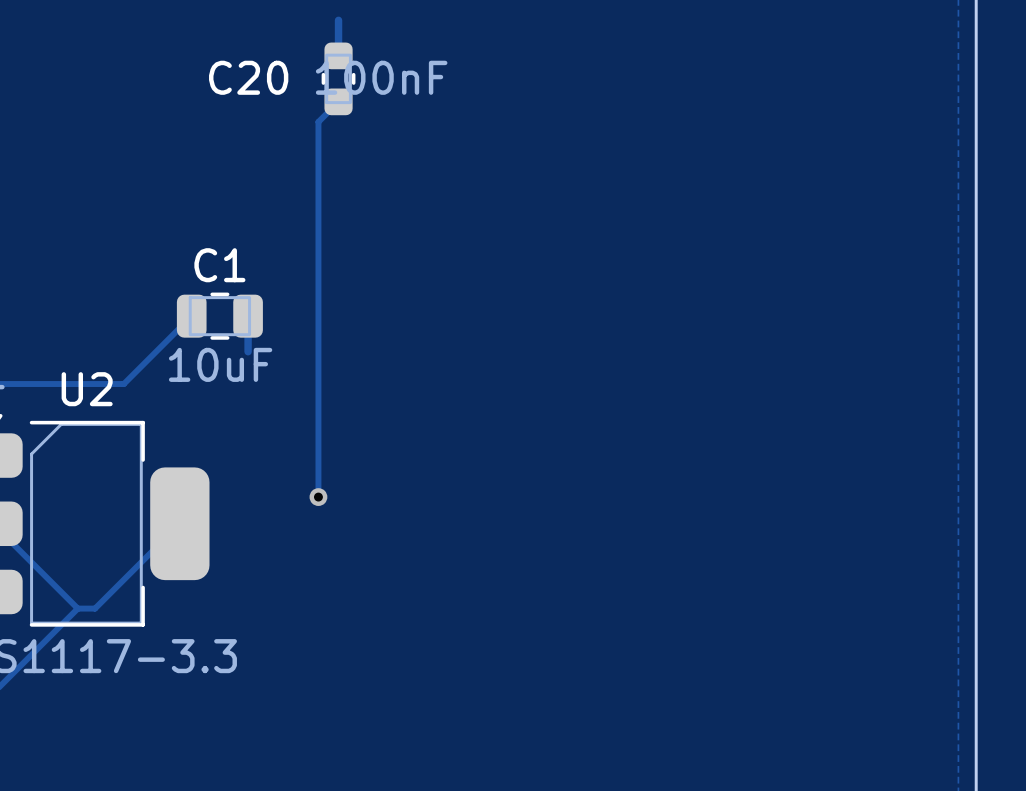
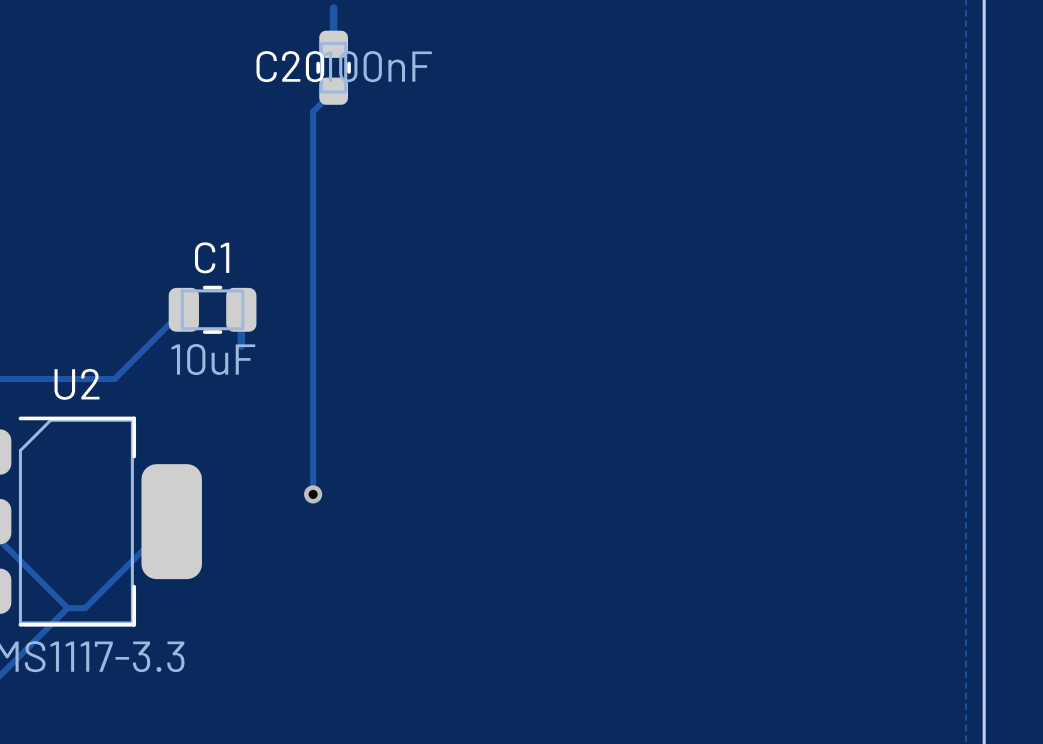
C20 name position: C20 (248, 77) -> C20 (290, 66)

